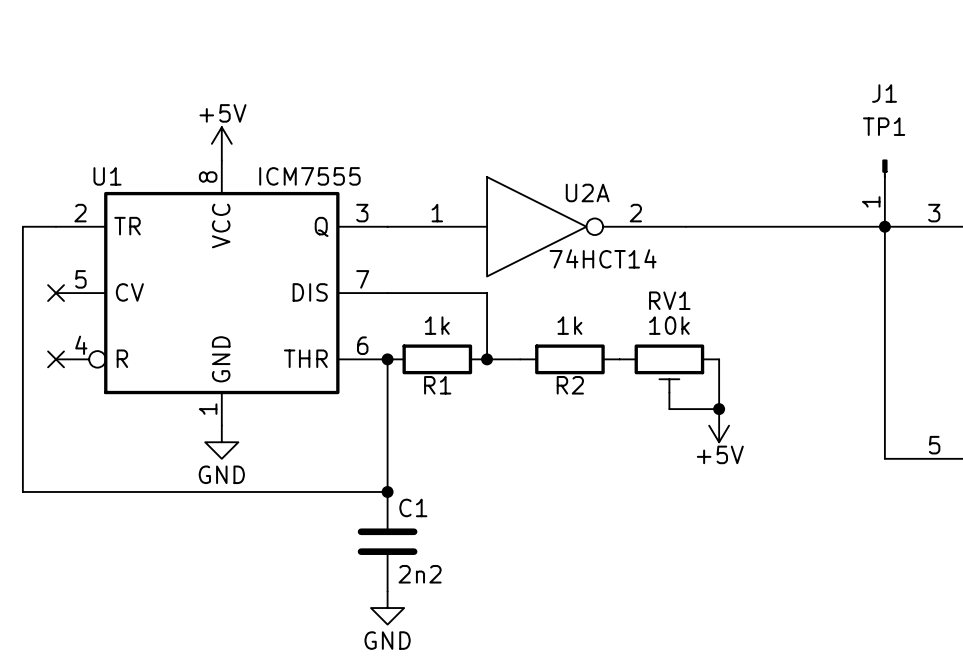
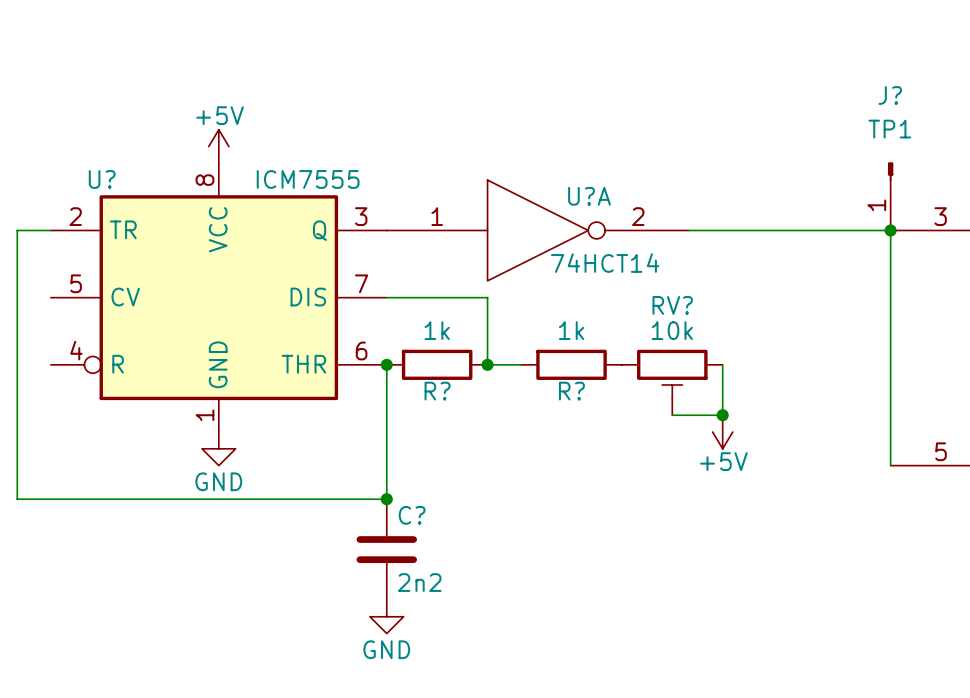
J1 name: J1 (884, 93) -> J? (890, 95)
U1 name: U1 (107, 176) -> U? (102, 179)
U2A name: U2A (587, 192) -> U?A (589, 196)
no-connect mark: (56, 293) -> none
RV1 name: RV1 (669, 300) -> RV? (672, 305)
no-connect mark: (56, 359) -> none
R1 name: R1 (437, 385) -> R? (437, 391)
R2 name: R2 (570, 385) -> R? (571, 391)
C1 name: C1 (413, 507) -> C? (412, 515)

